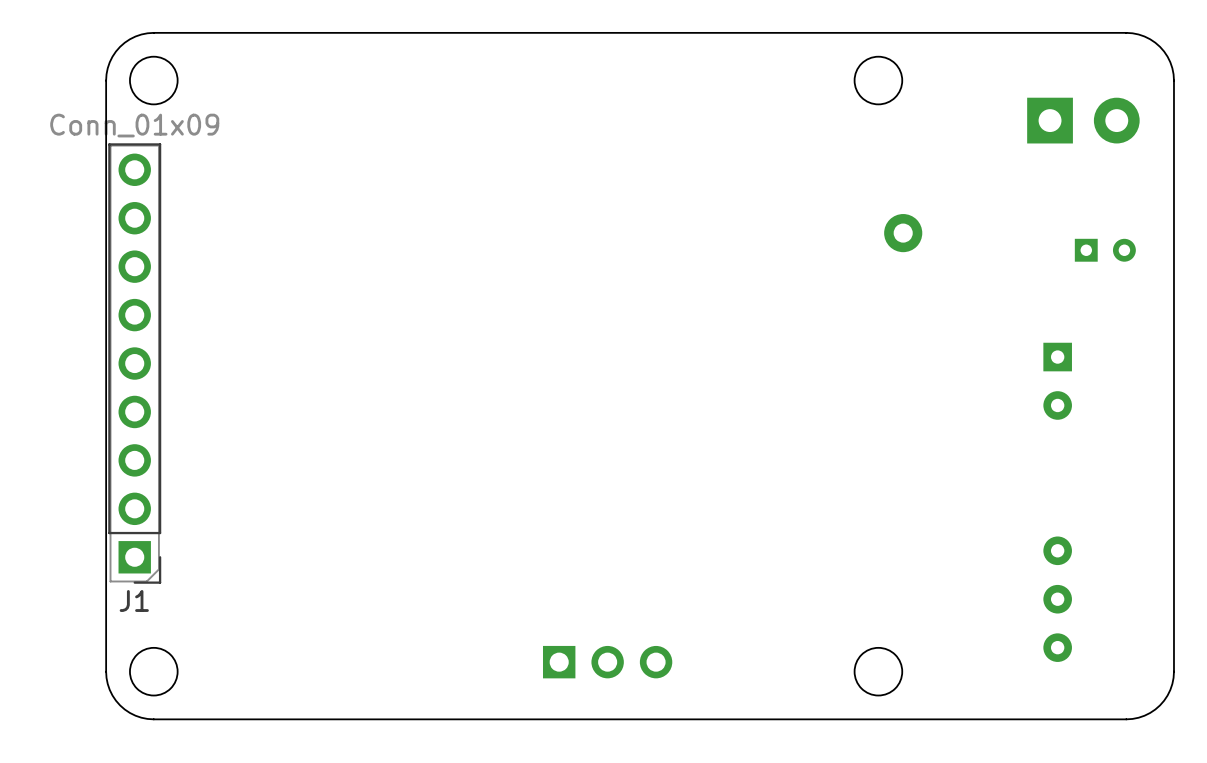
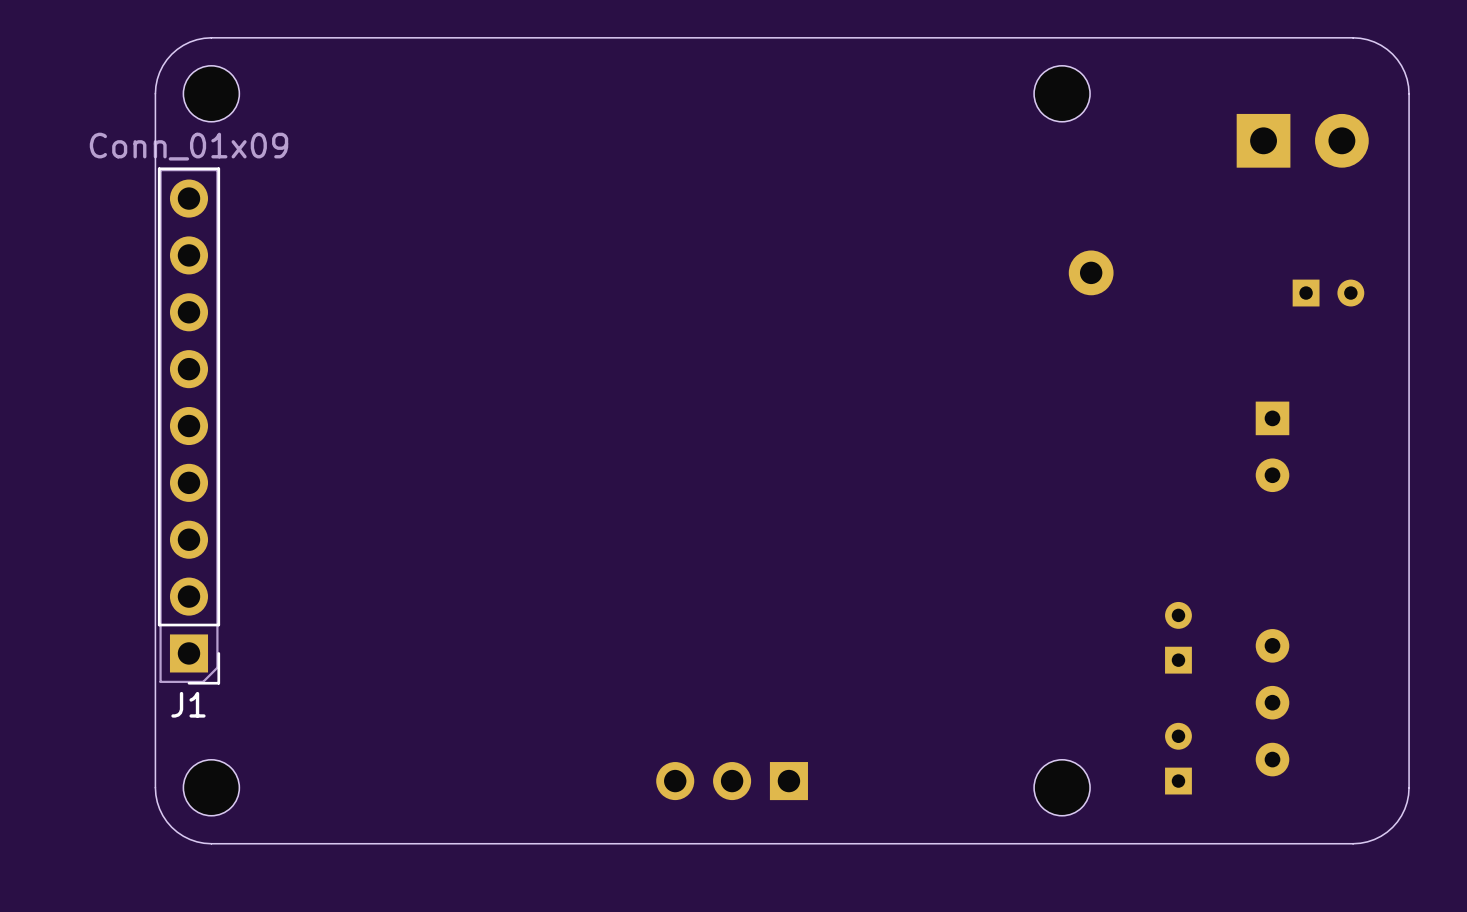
part: none -> (1178, 637)
part: none -> (1178, 758)
part rotation: 0° (607, 662) -> 180° (732, 781)

